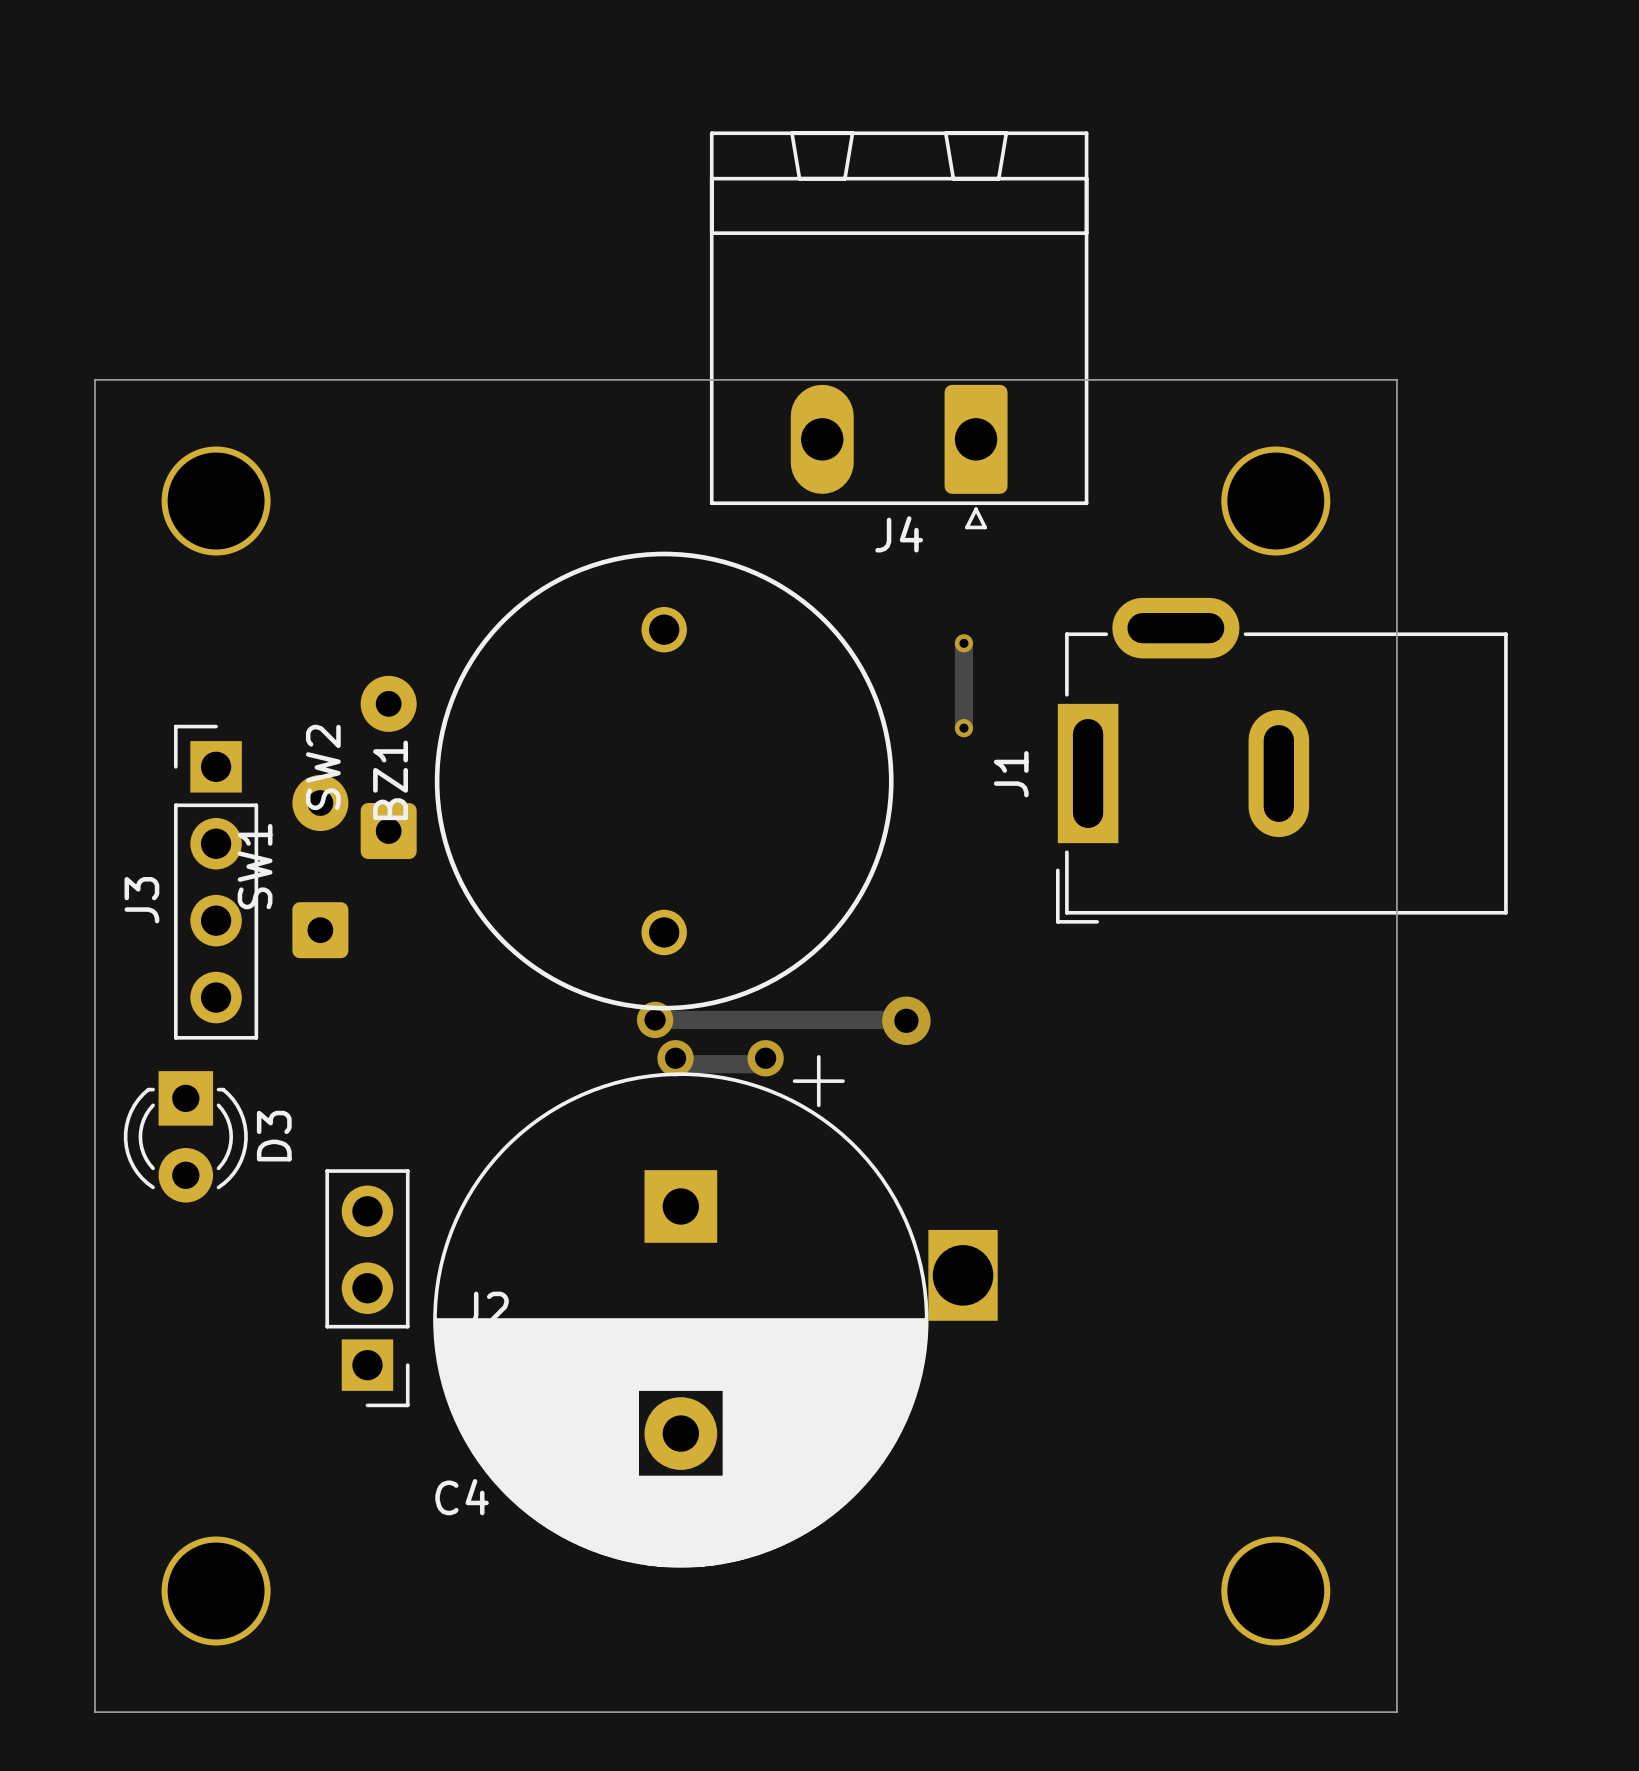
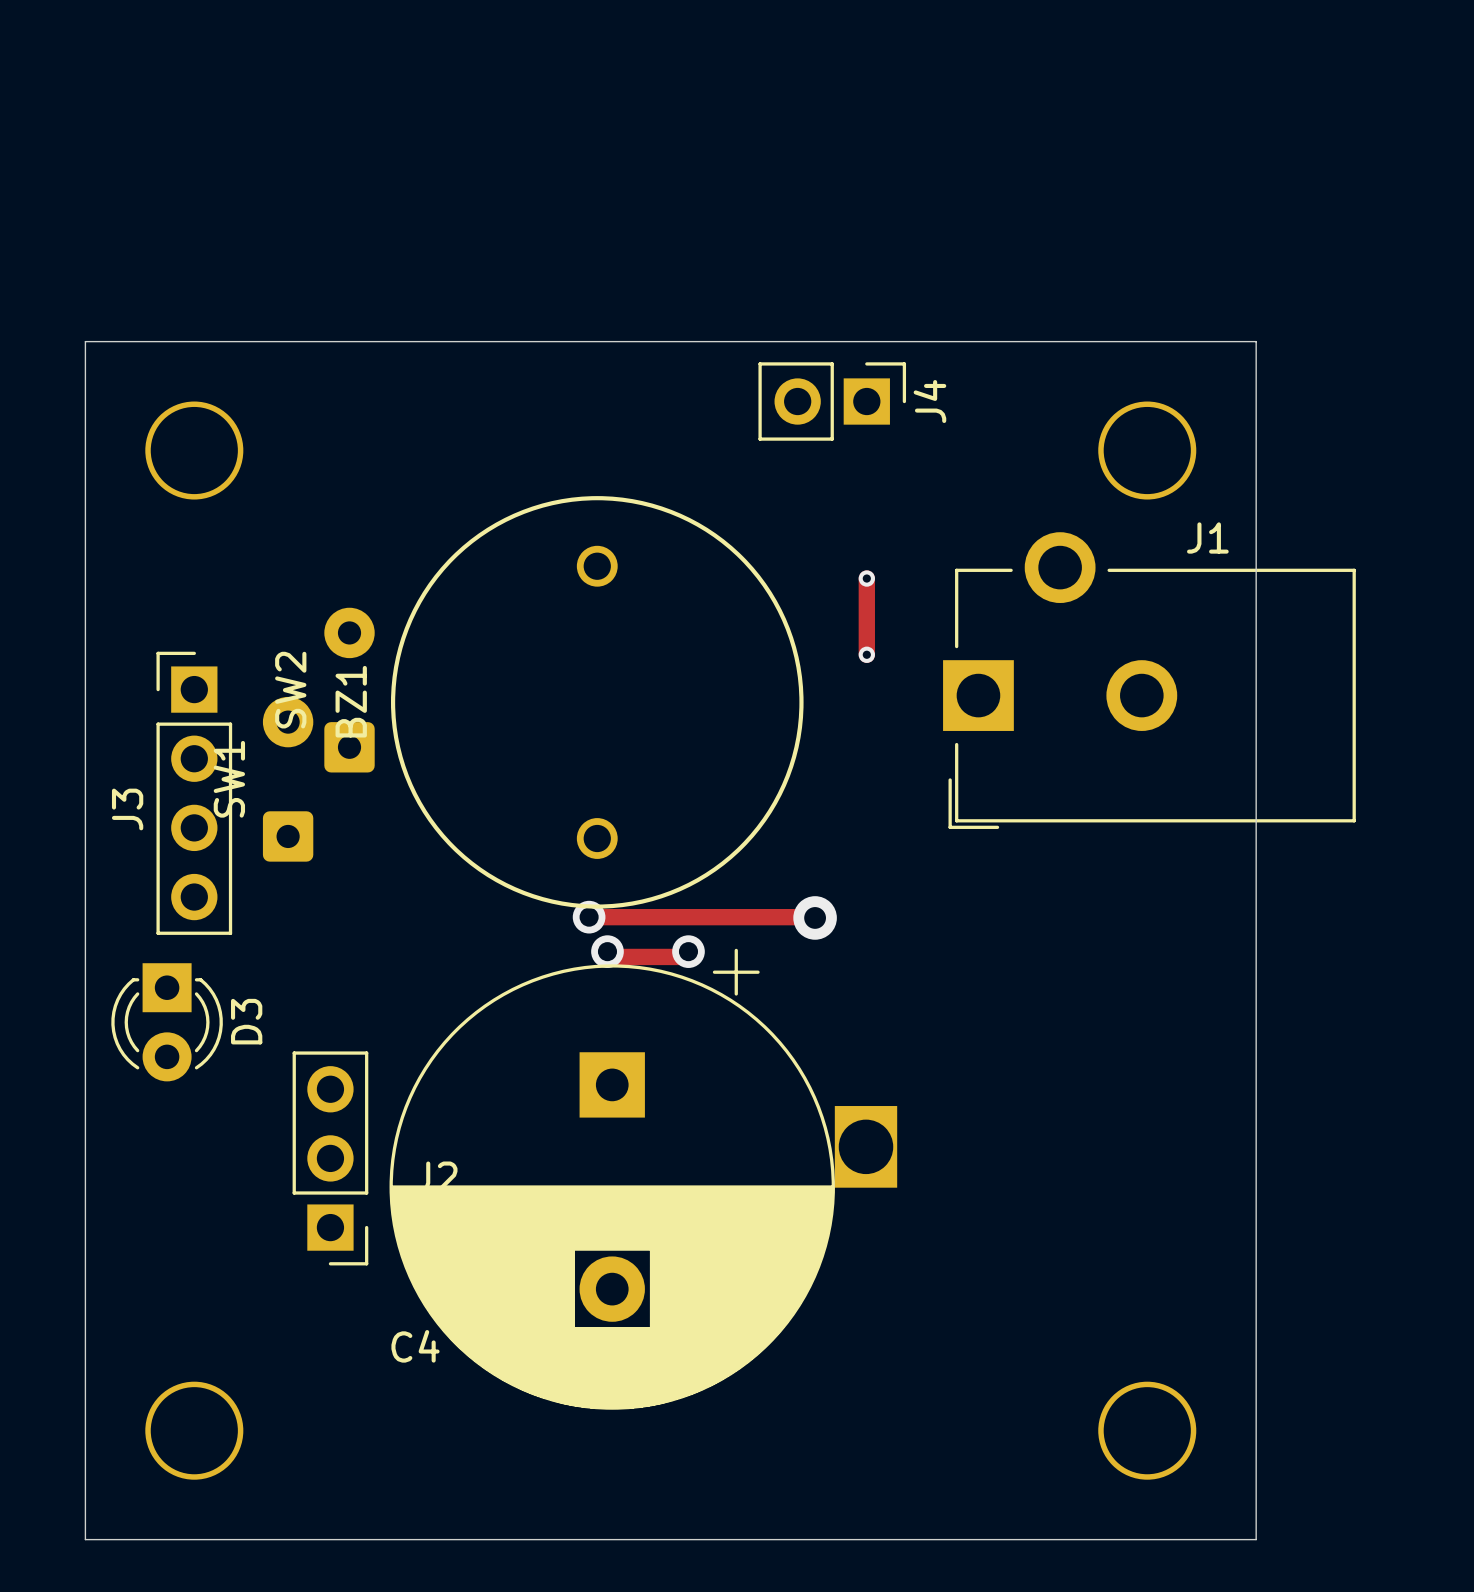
J4 footprint: [709, 131, 1089, 530] -> [758, 362, 907, 441]
J4 name position: J4 (899, 534) -> J4 (929, 401)
J1 footprint: [1055, 597, 1508, 924] -> [943, 532, 1356, 829]
J1 name position: J1 (1011, 774) -> J1 (1207, 537)

